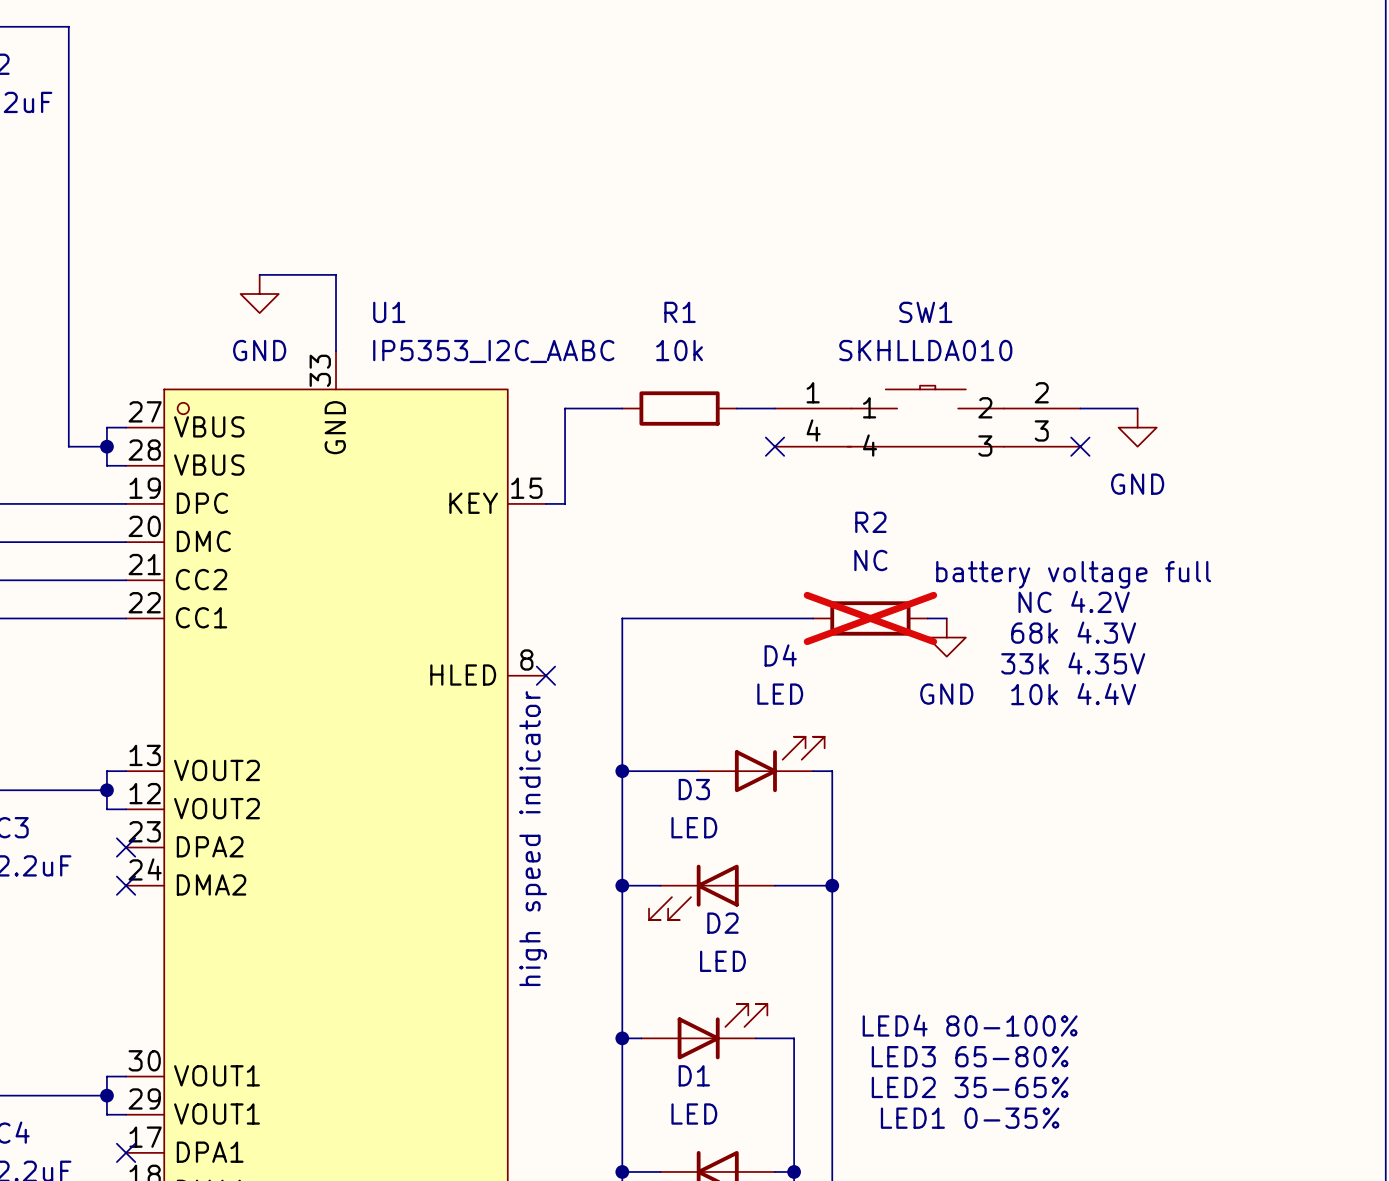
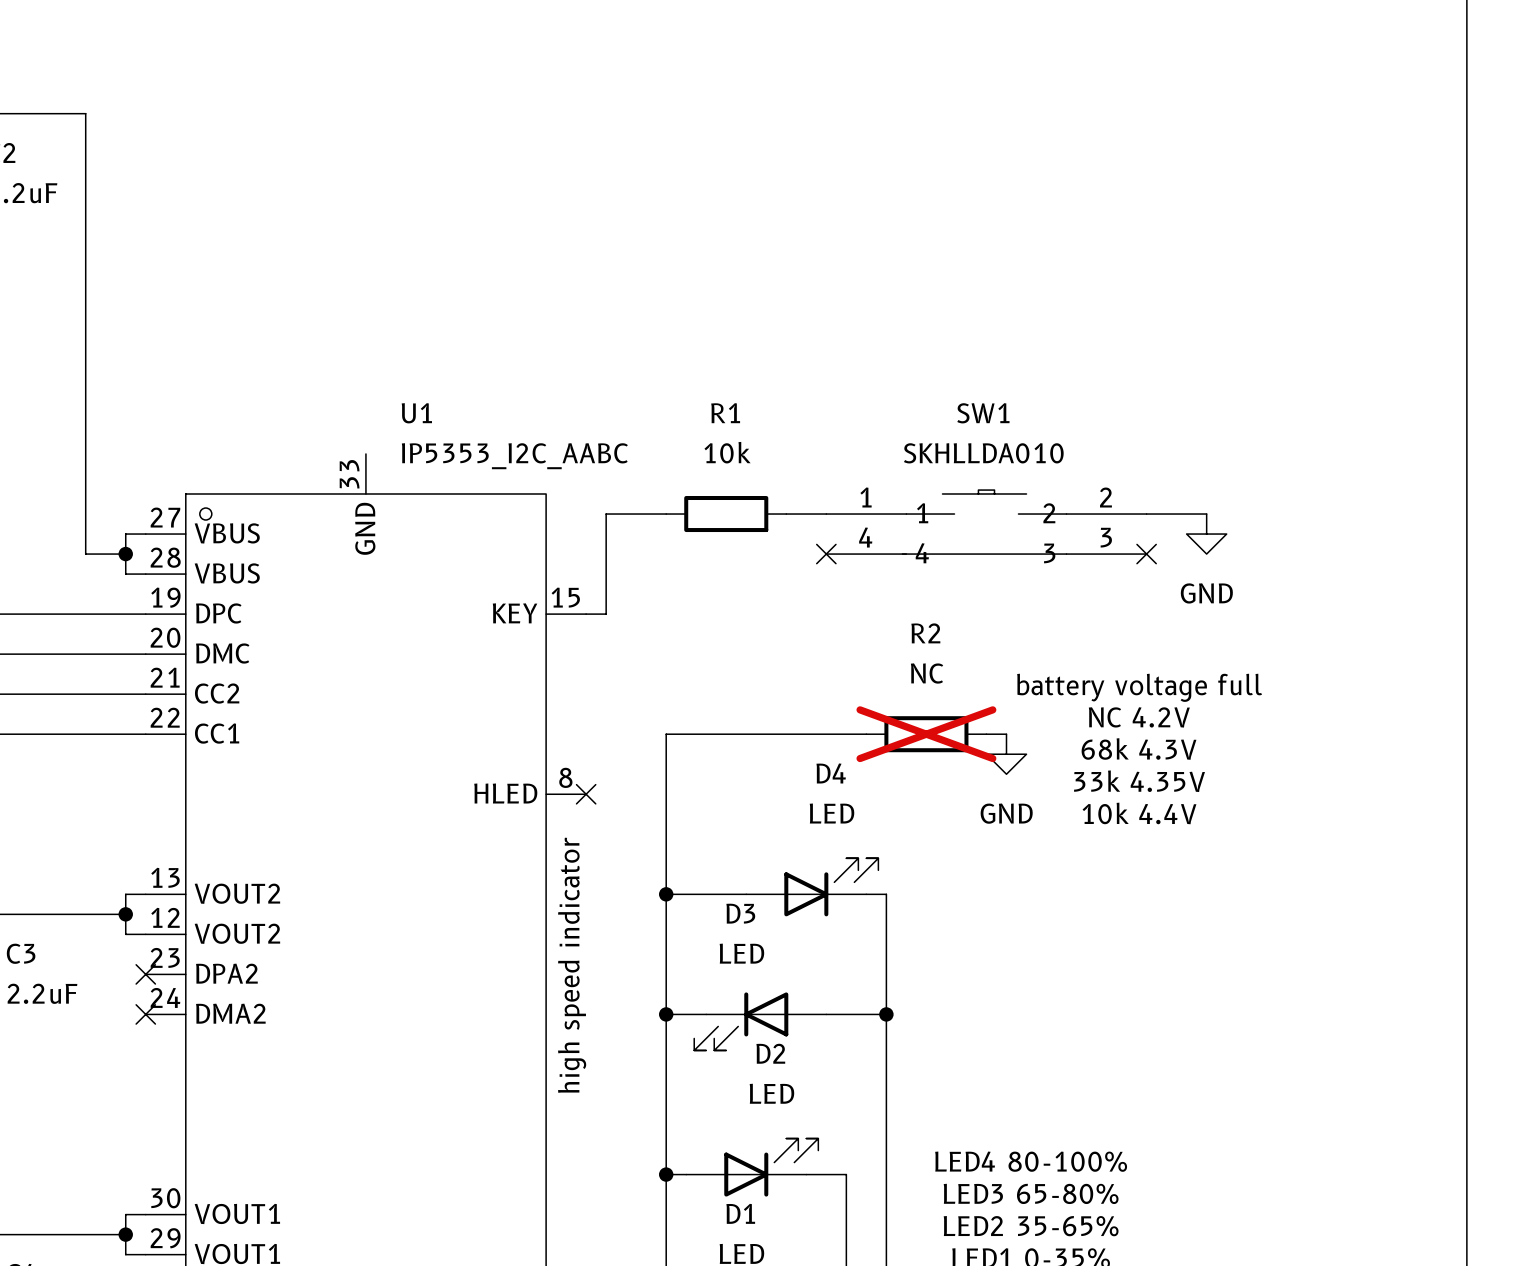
wire: (259, 274) (336, 274) (336, 351) -> none
power symbol: GND (259, 294) -> none

